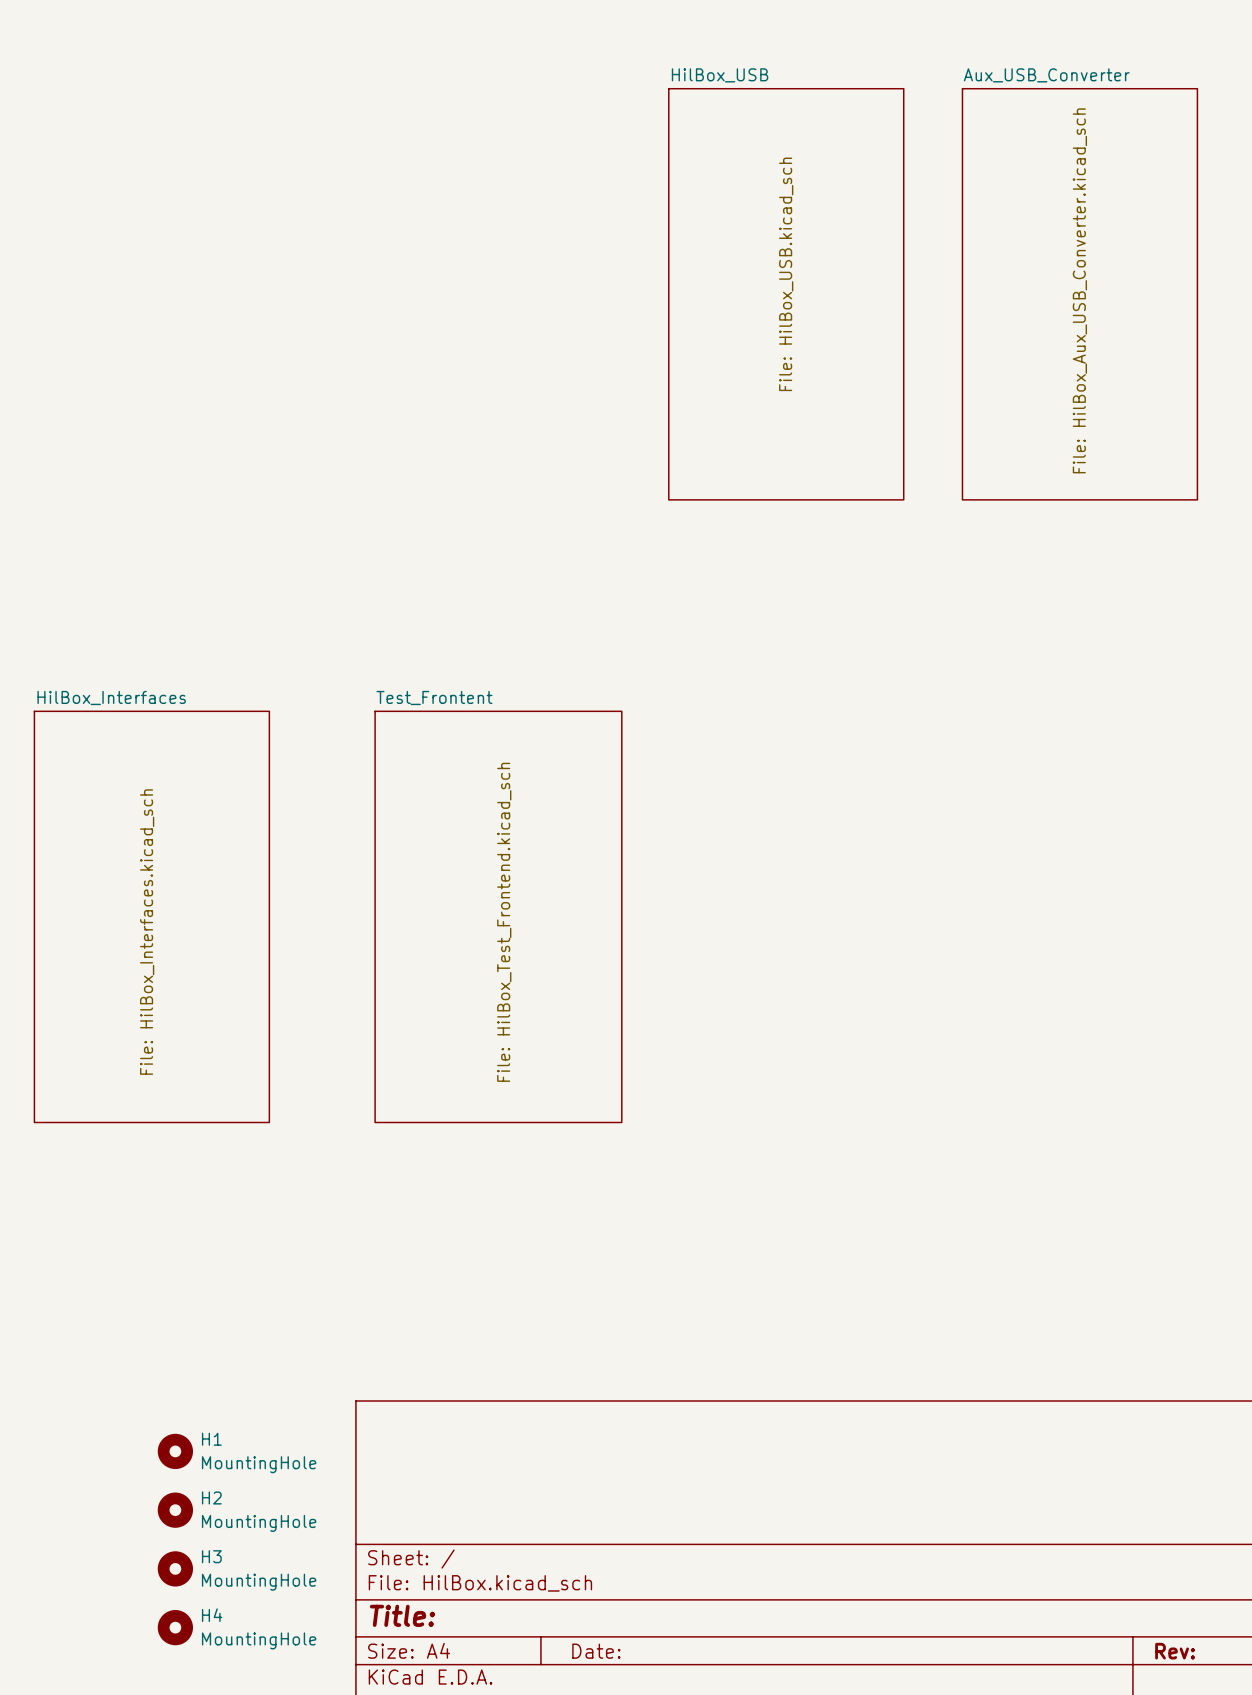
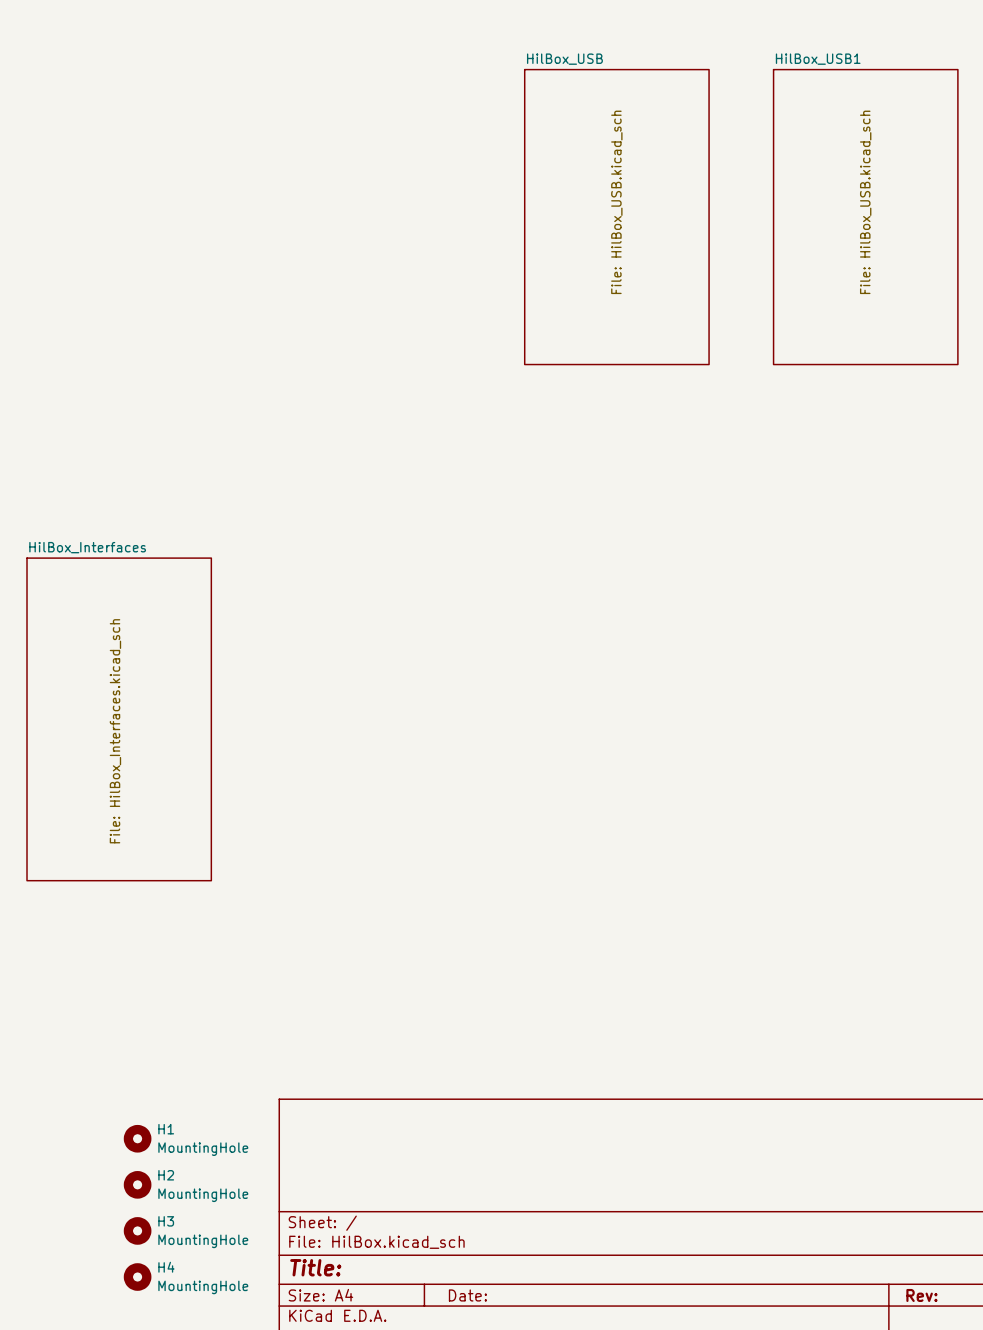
sheet HilBox_USB: none -> File: HilBox_USB.kicad_sch (616, 217)
sheet HilBox_USB1: none -> File: HilBox_USB.kicad_sch (865, 217)
sheet HilBox_USB: File: HilBox_USB.kicad_sch (786, 294) -> none
sheet Aux_USB_Converter: File: HilBox_Aux_USB_Converter.kicad_sch (1079, 294) -> none
sheet Test_Frontent: File: HilBox_Test_Frontend.kicad_sch (498, 916) -> none

